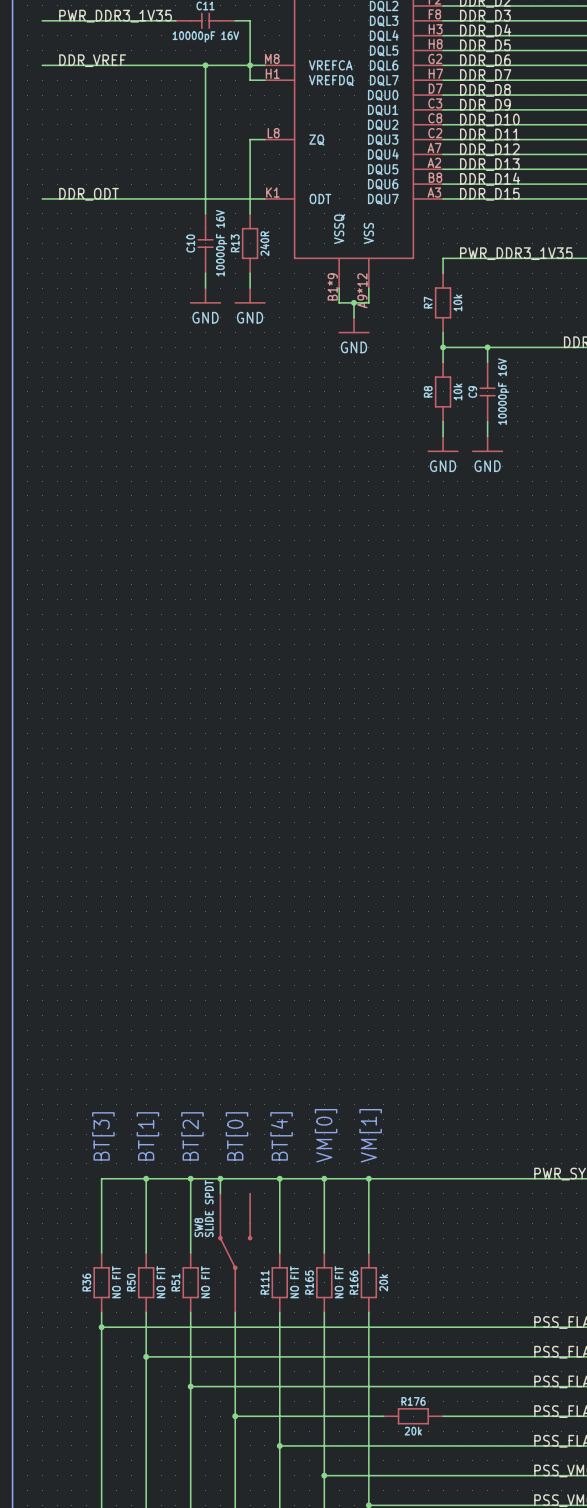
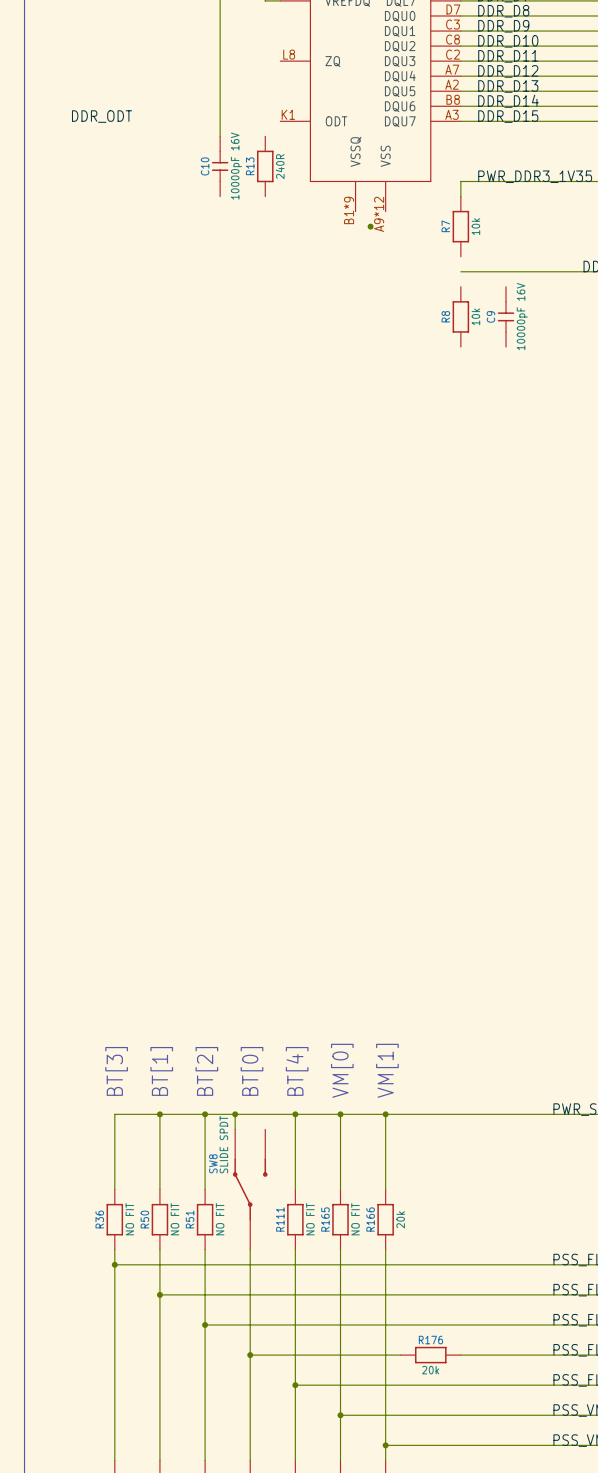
wire: (264, 139) (250, 139) (250, 213) -> none
wire: (42, 198) (264, 198) -> none
wire: (205, 273) (205, 288) -> none
wire: (250, 273) (250, 288) -> none
wire: (339, 288) (339, 302) (368, 302) (368, 288) -> none
power symbol: GND (205, 295) -> none
power symbol: GND (250, 295) -> none
wire: (354, 302) (354, 317) -> none
power symbol: GND (354, 325) -> none
wire: (443, 332) (443, 362) -> none
junction: (443, 347) -> none
wire: (487, 347) (487, 362) -> none
junction: (487, 347) -> none
wire: (443, 421) (443, 436) -> none
wire: (487, 421) (487, 436) -> none
power symbol: GND (443, 444) -> none
power symbol: GND (487, 444) -> none

